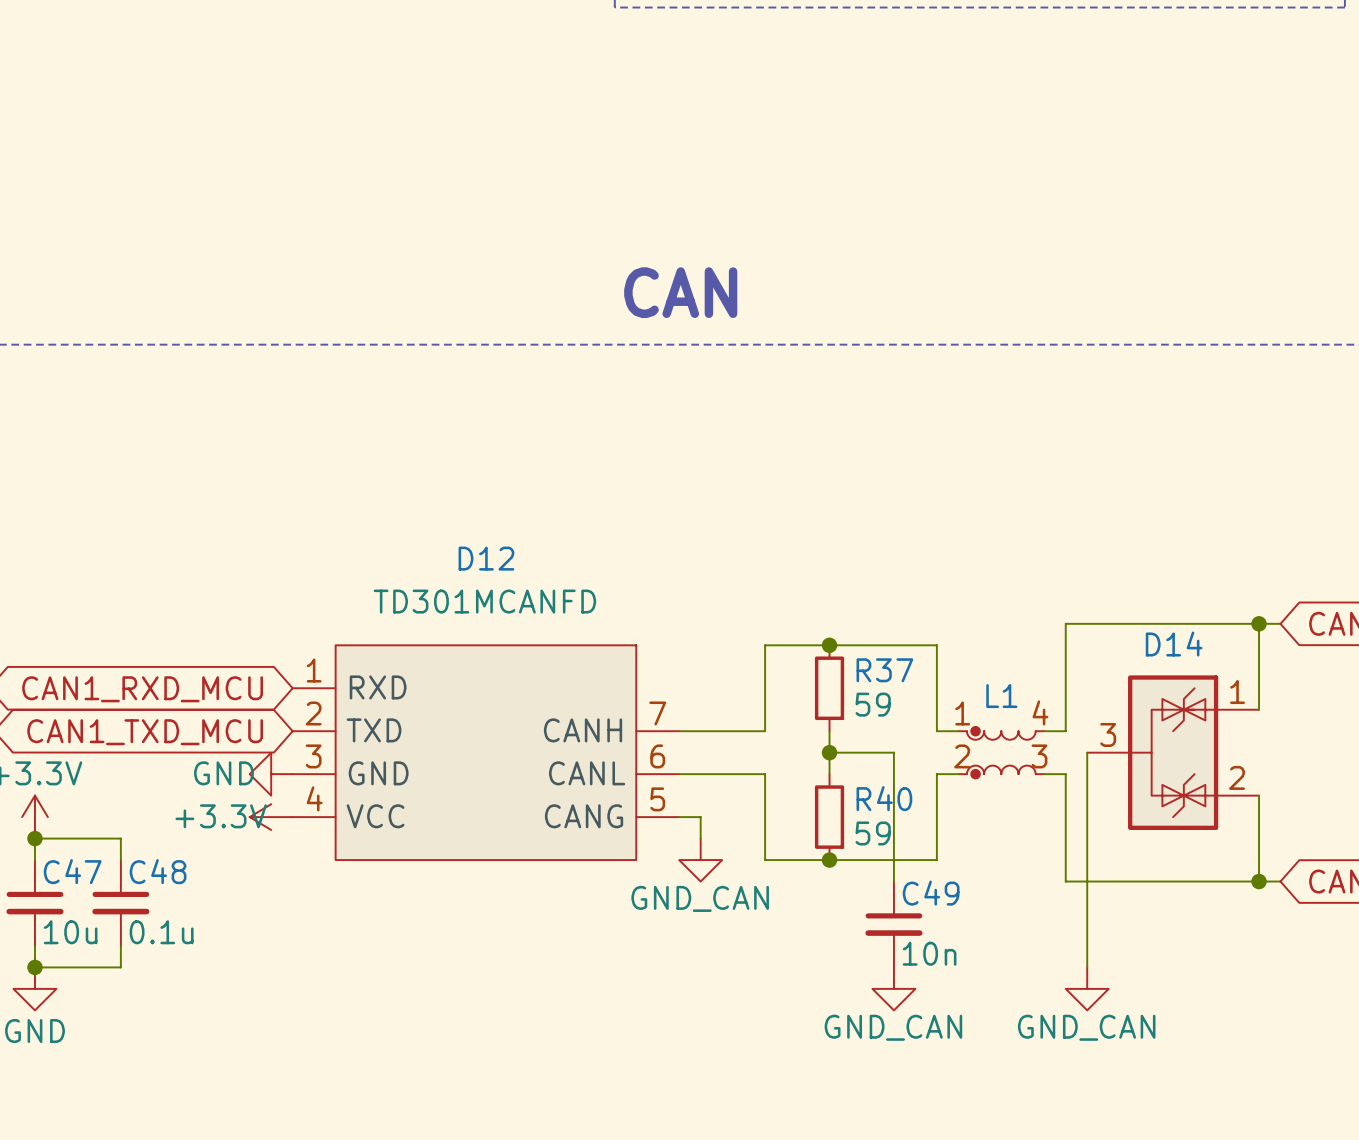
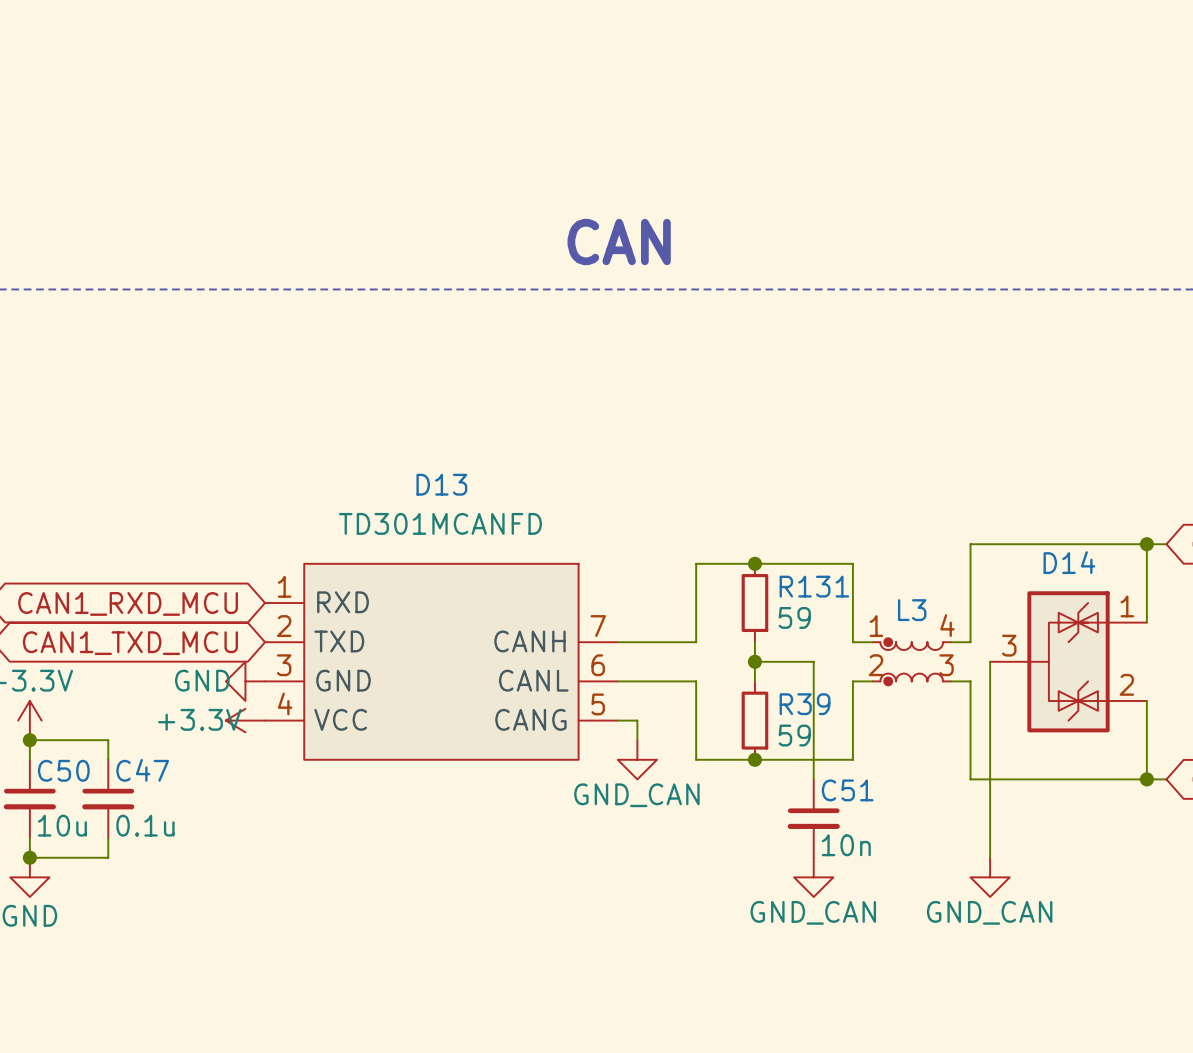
D12 name: D12 (486, 558) -> D13 (441, 484)
R37 name: R37 (884, 670) -> R131 (814, 586)
L1 name: L1 (1001, 696) -> L3 (912, 610)
R40 name: R40 (884, 798) -> R39 (805, 704)
C47 name: C47 (72, 871) -> C50 (63, 770)
C48 name: C48 (158, 871) -> C47 (142, 770)
C49 name: C49 (931, 893) -> C51 (847, 790)

